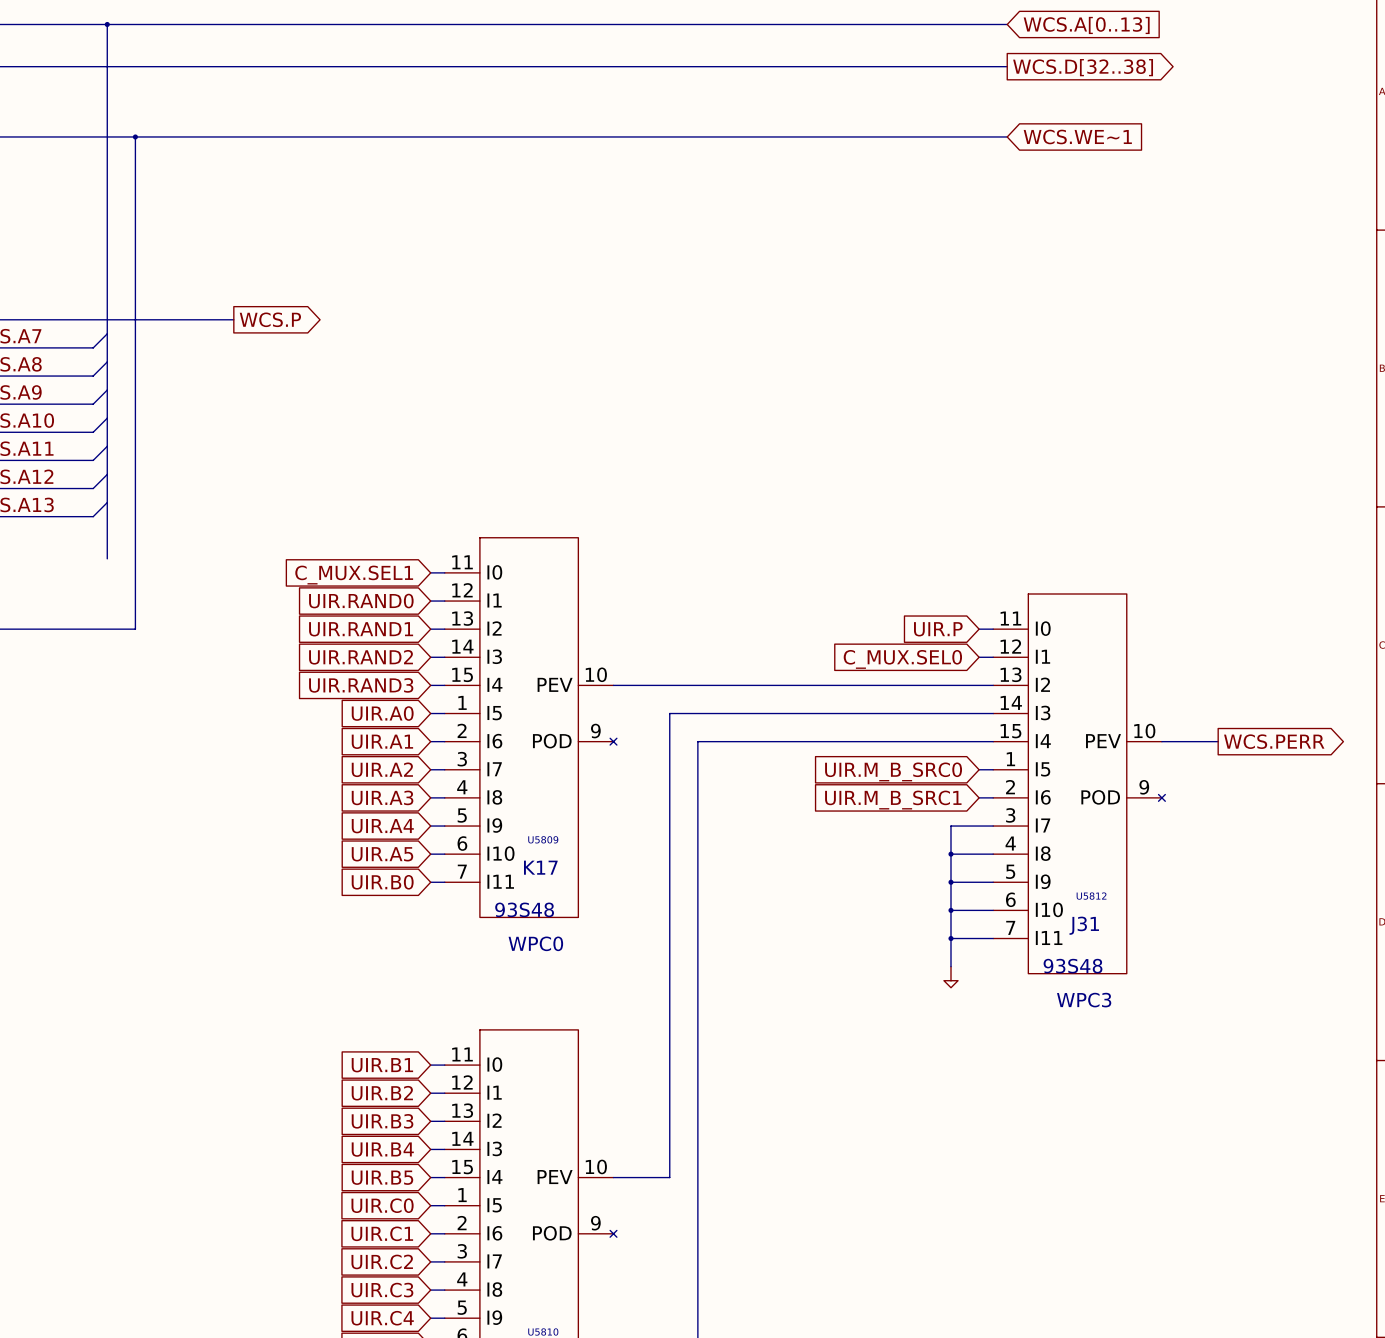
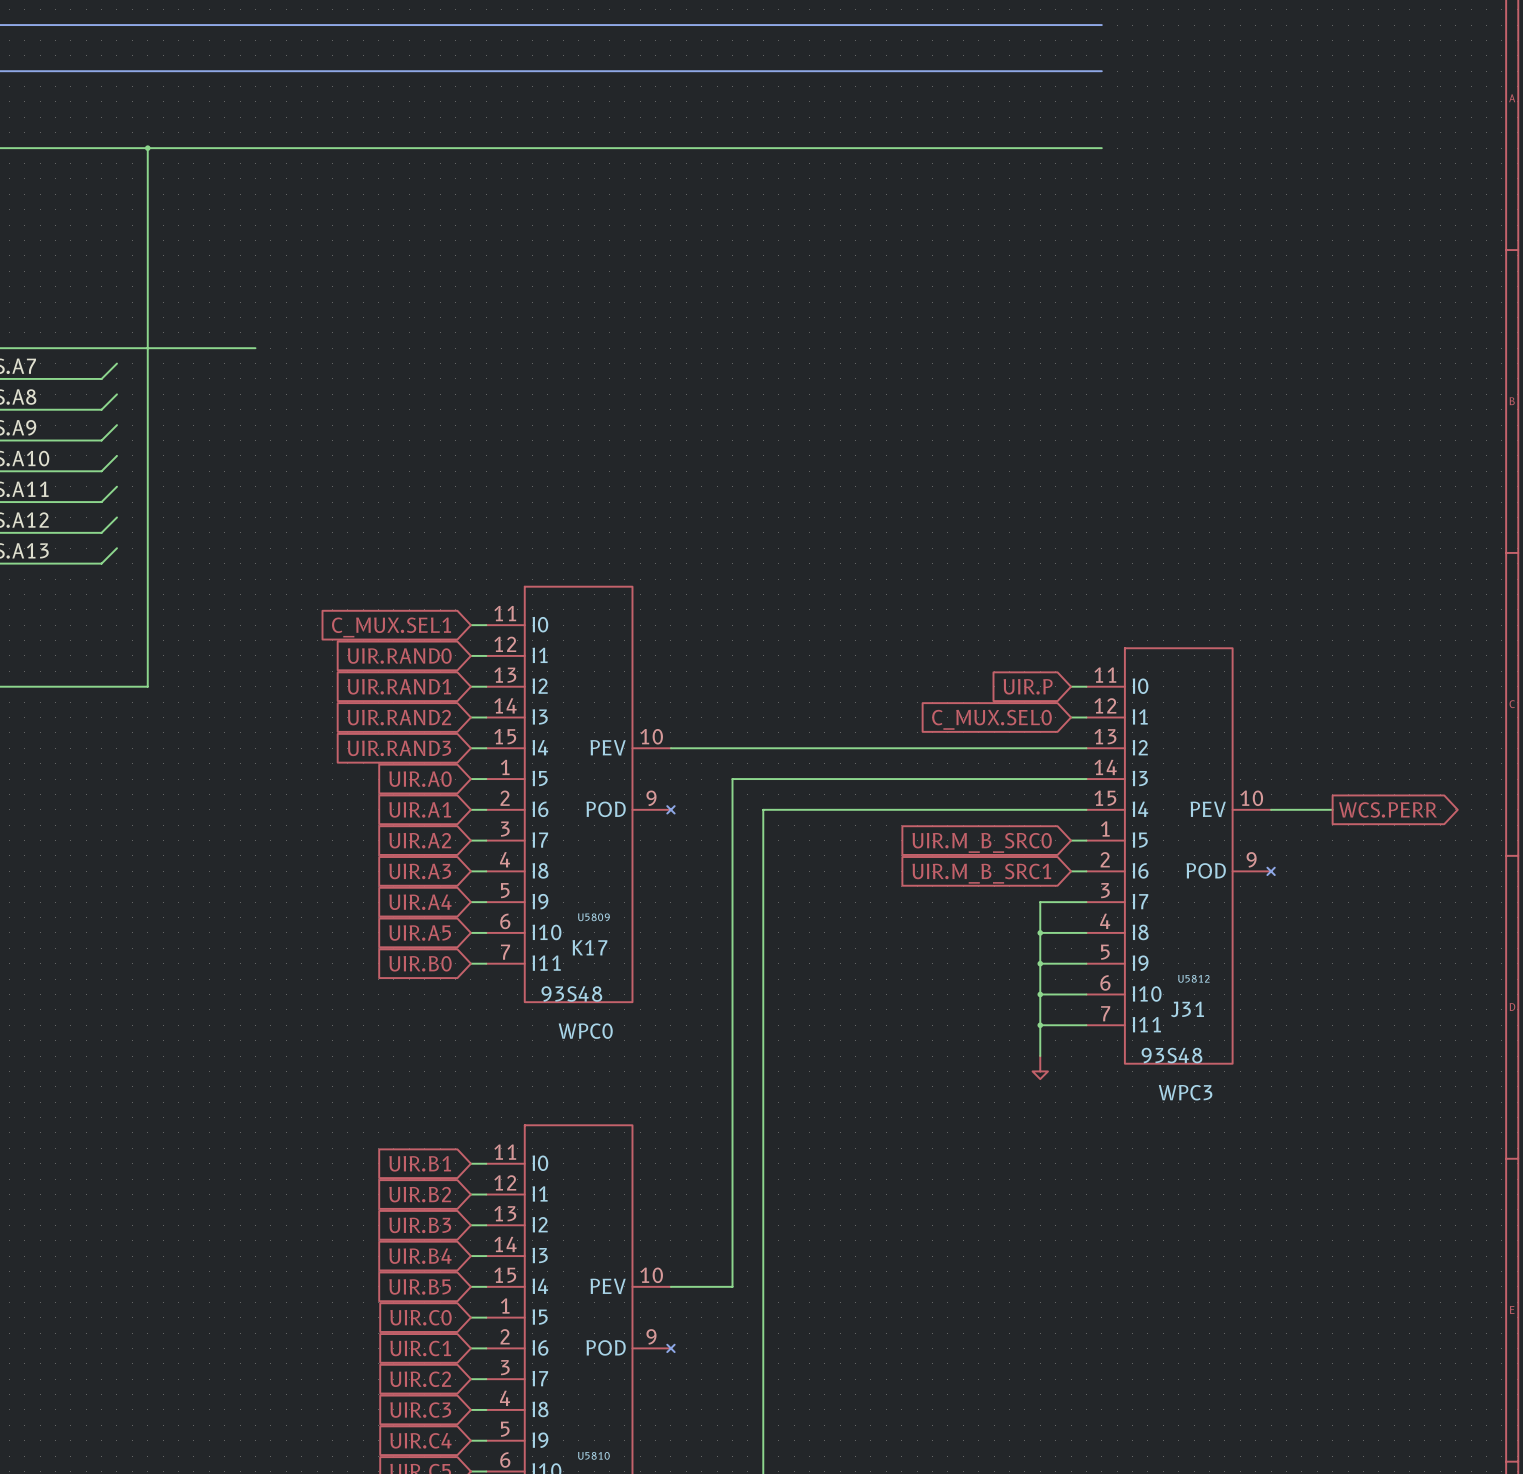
bus: (107, 24) (107, 558) -> none
junction: (107, 24) -> none
global label: WCS.A[0..13] (1086, 25) -> none
global label: WCS.D[32..38] (1083, 67) -> none
global label: WCS.WE~1 (1077, 136) -> none
global label: WCS.P (270, 319) -> none

